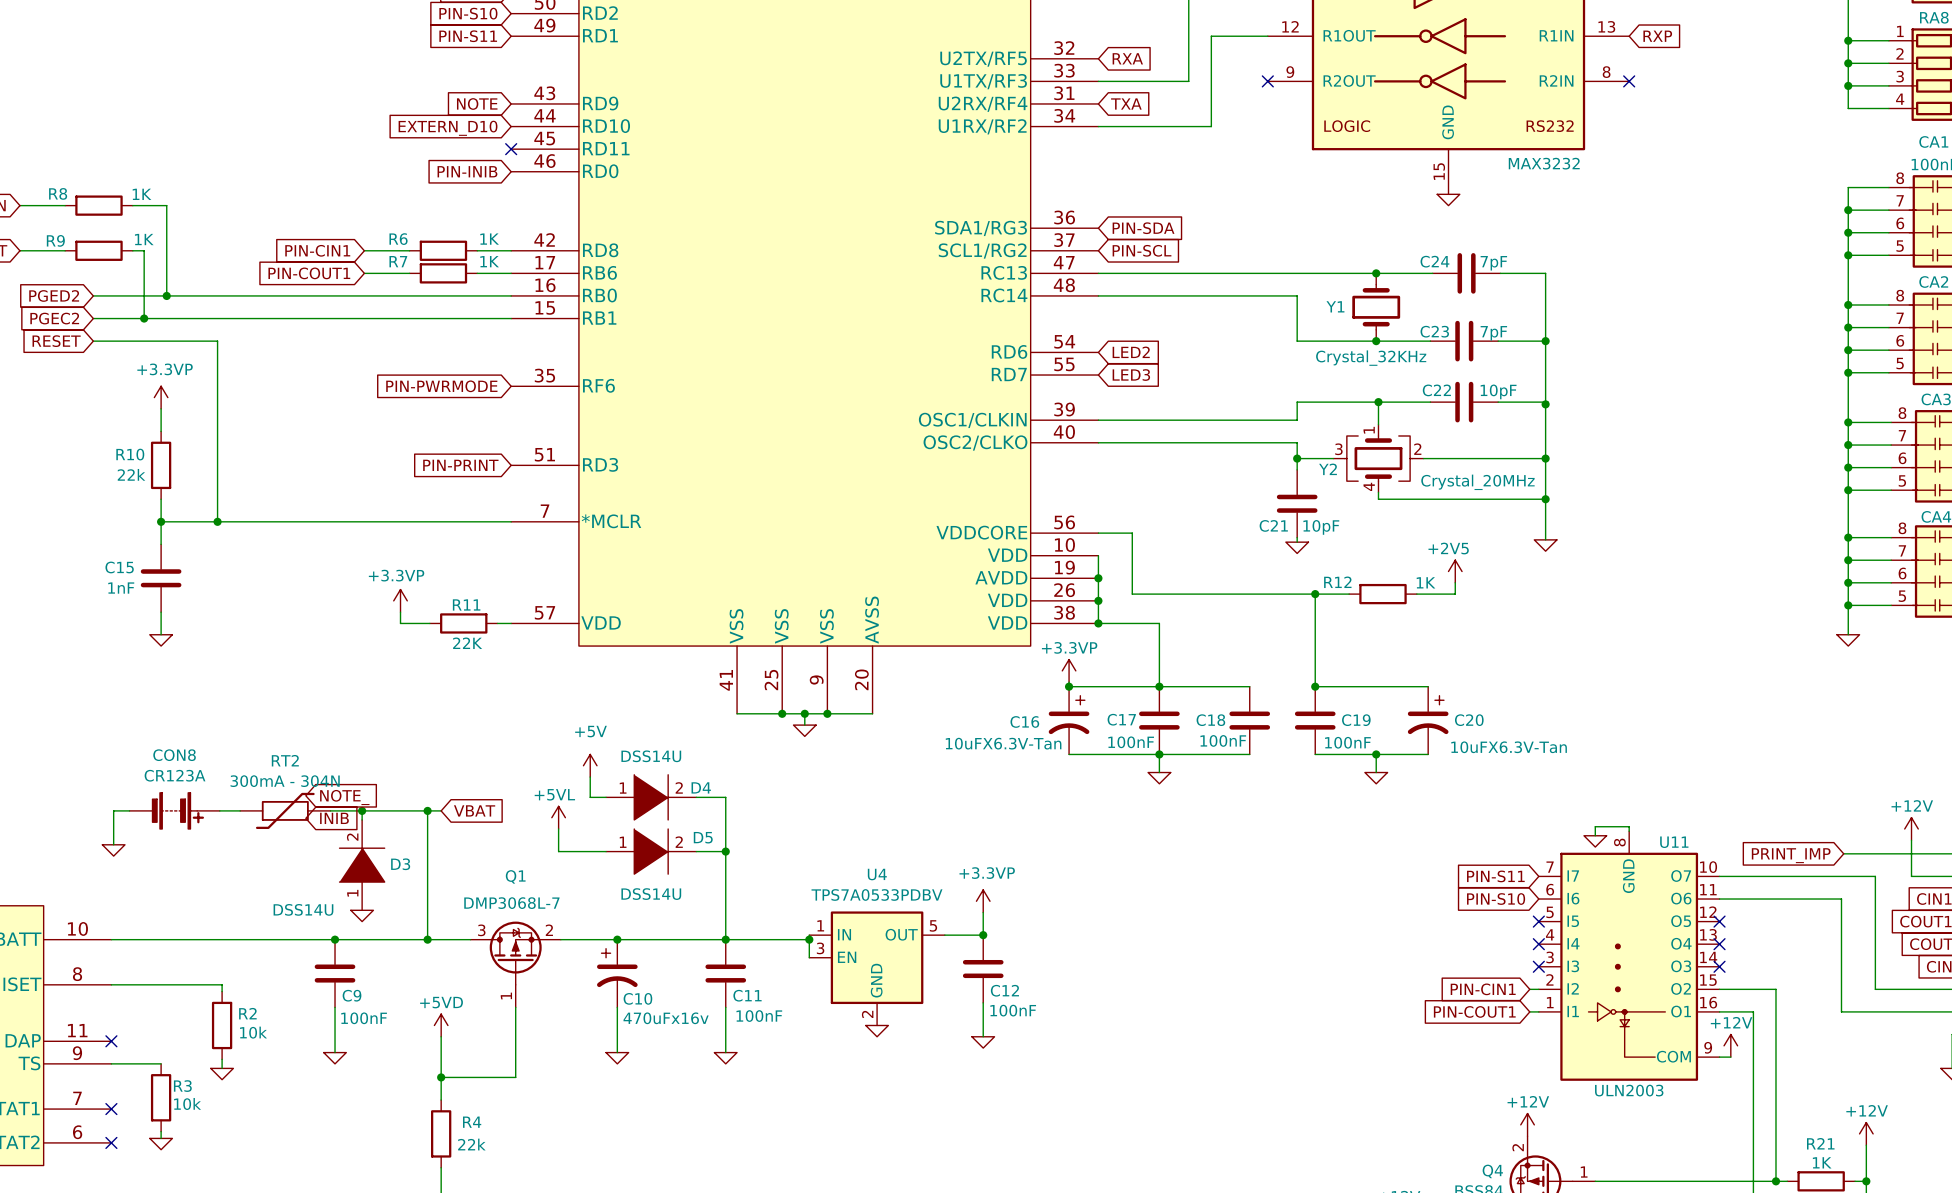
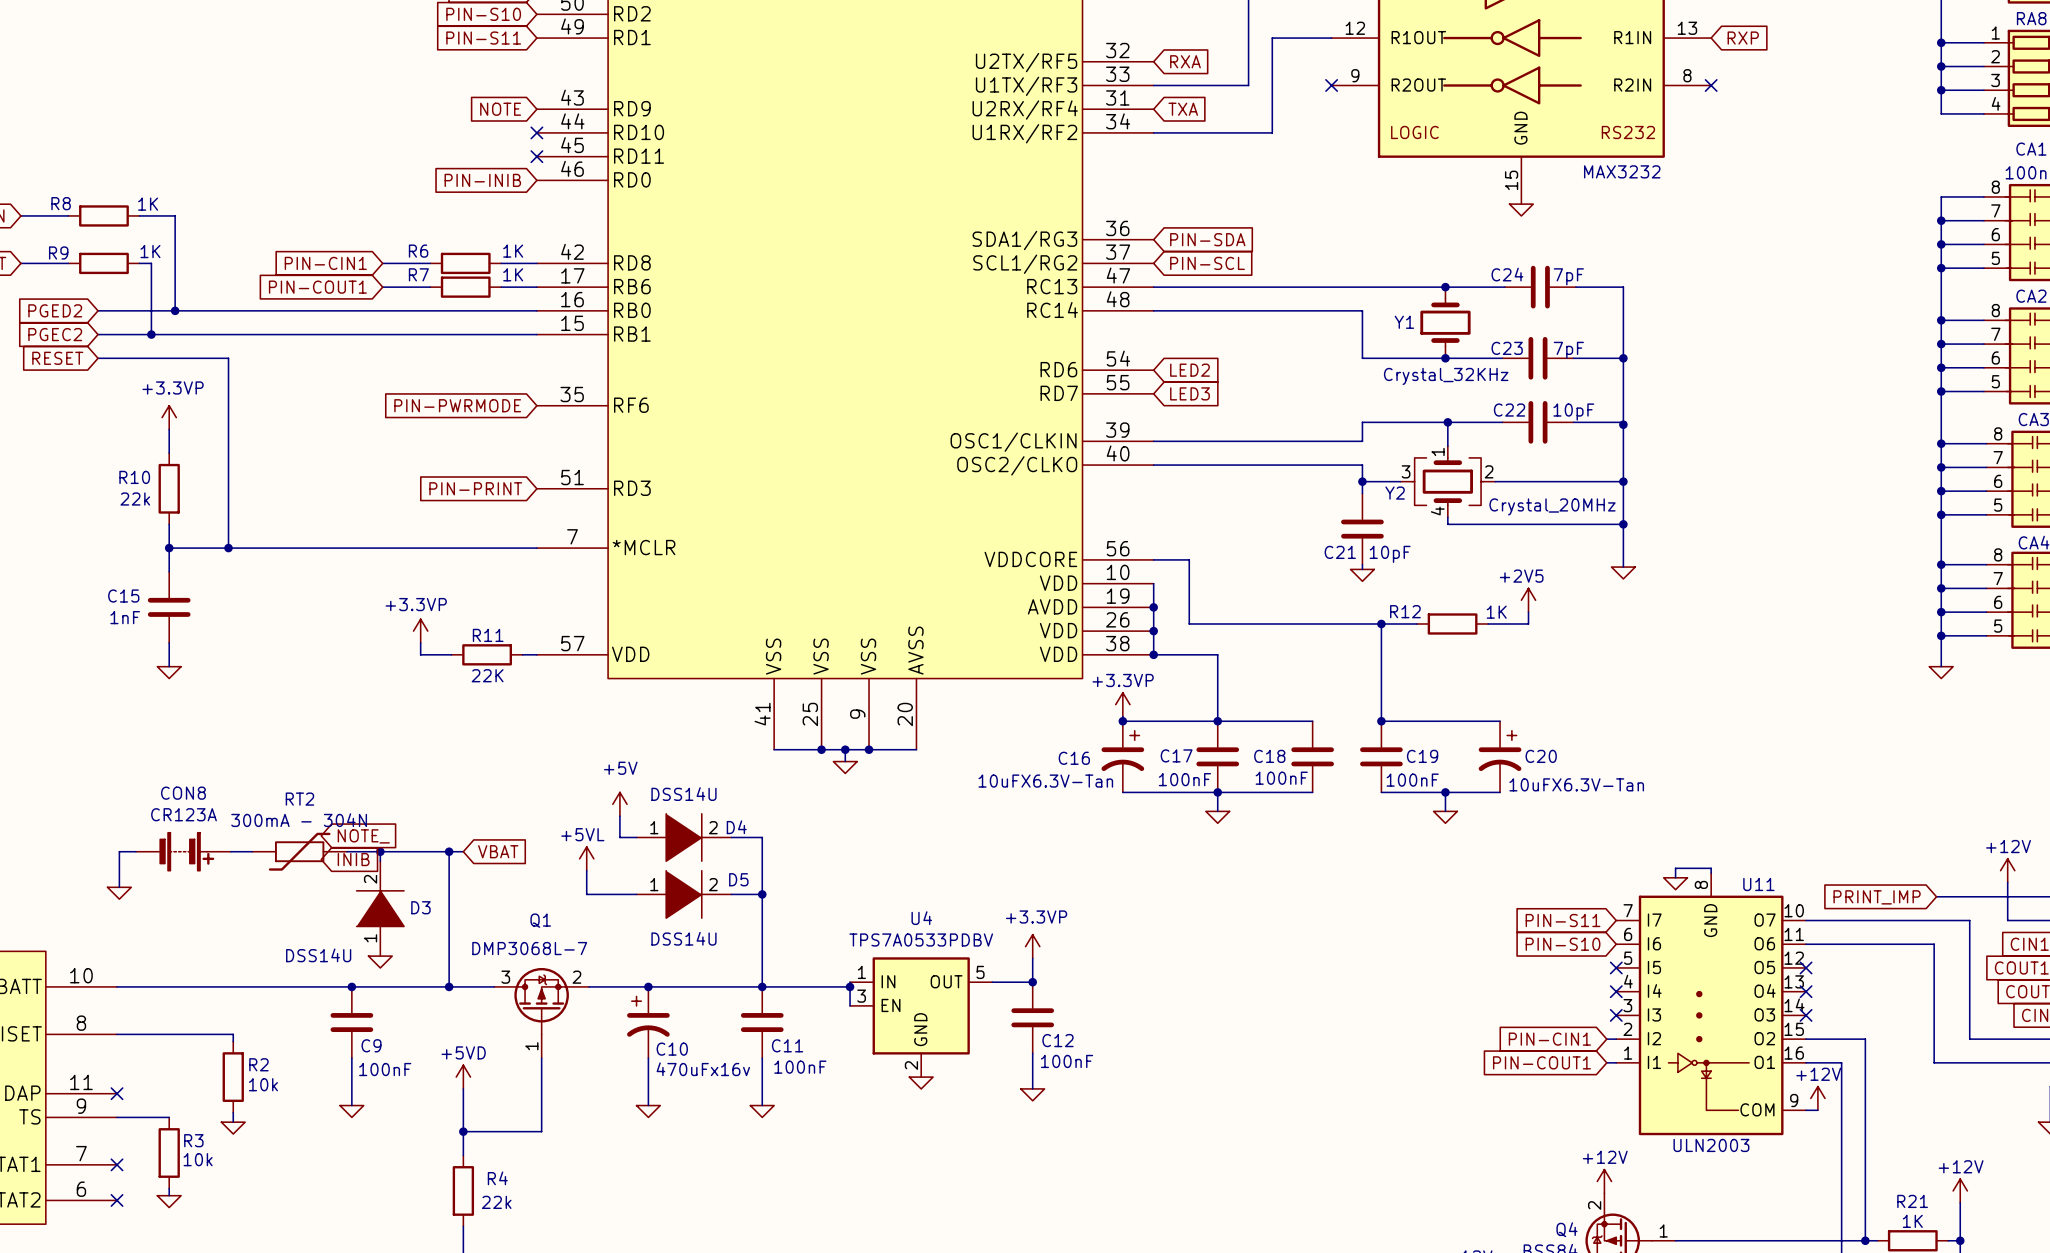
no-connect mark: none -> (536, 132)
global label: EXTERN_D10 (448, 128) -> none

